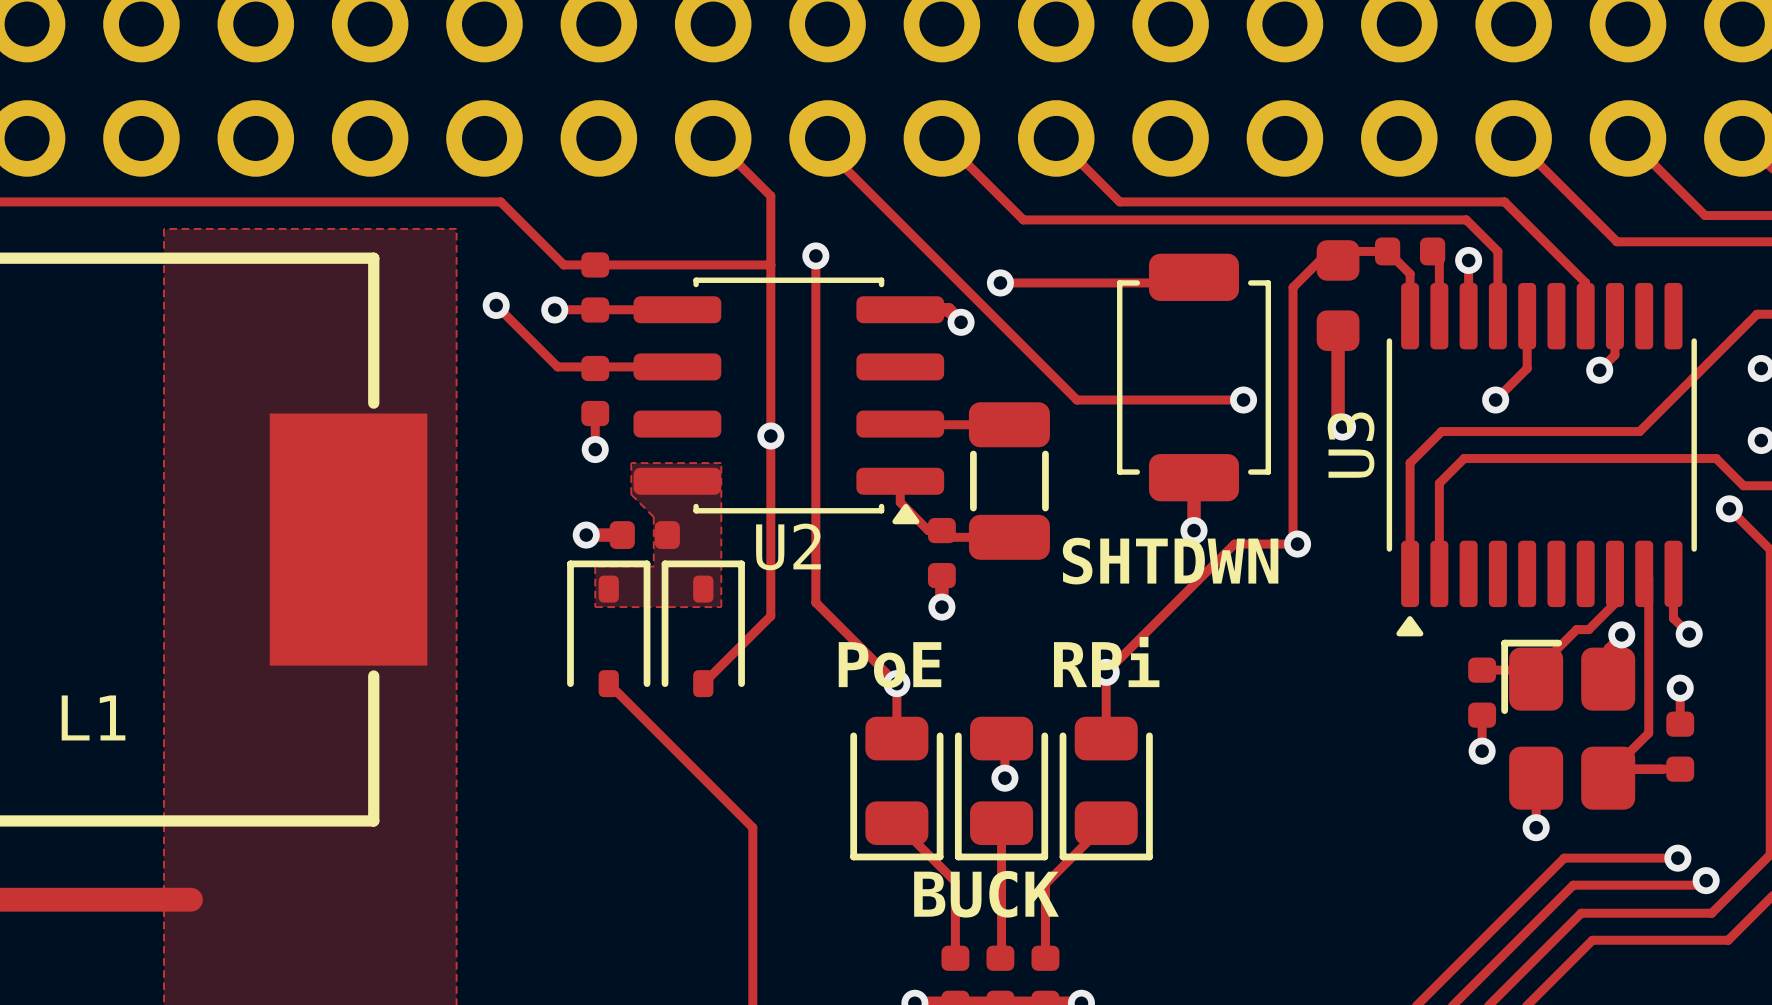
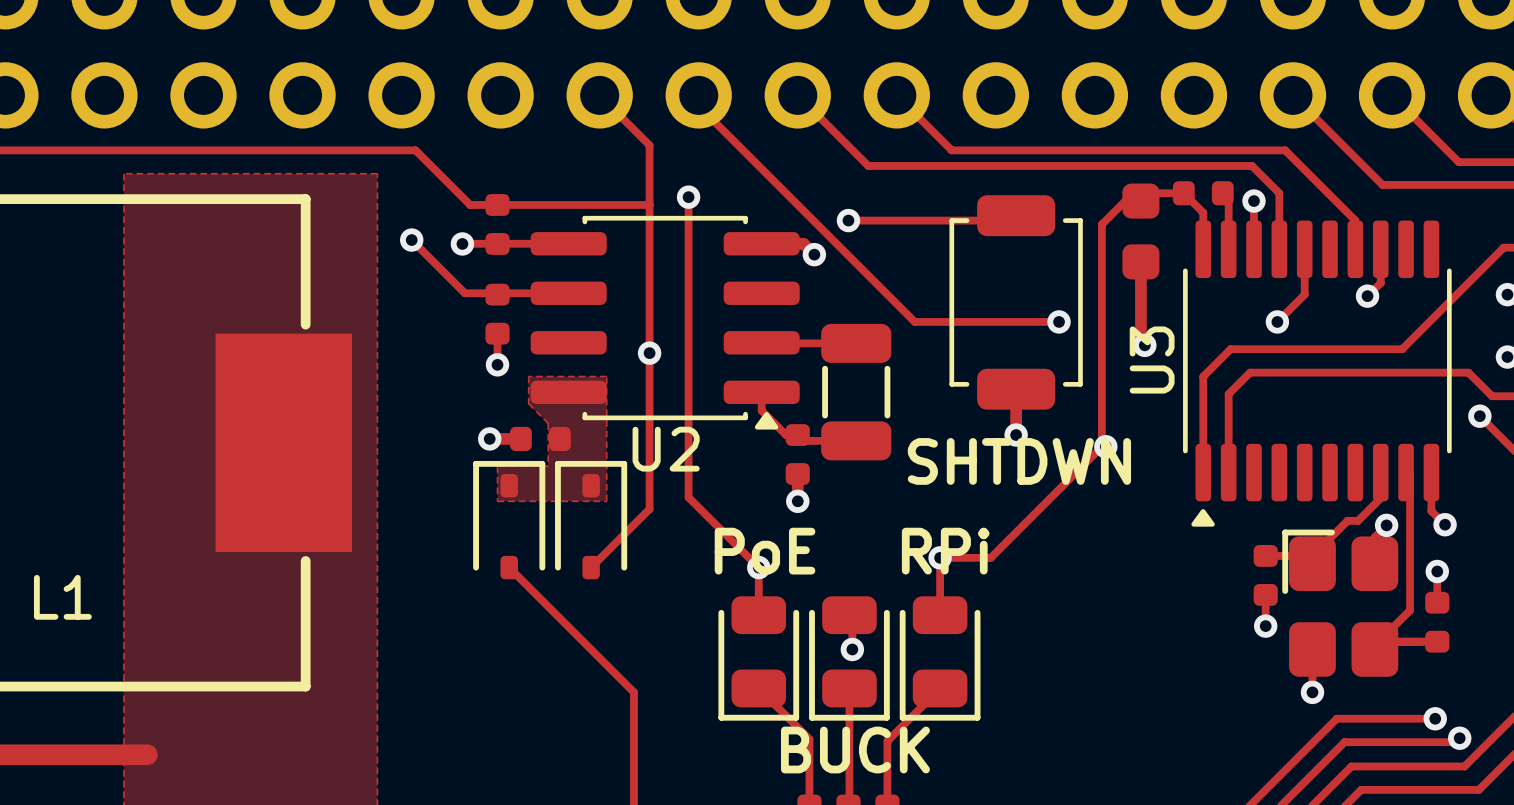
track: (1293, 539) (1297, 544) (1234, 544) (1106, 672) -> (1101, 442) (1101, 446) (990, 557) (940, 557)

